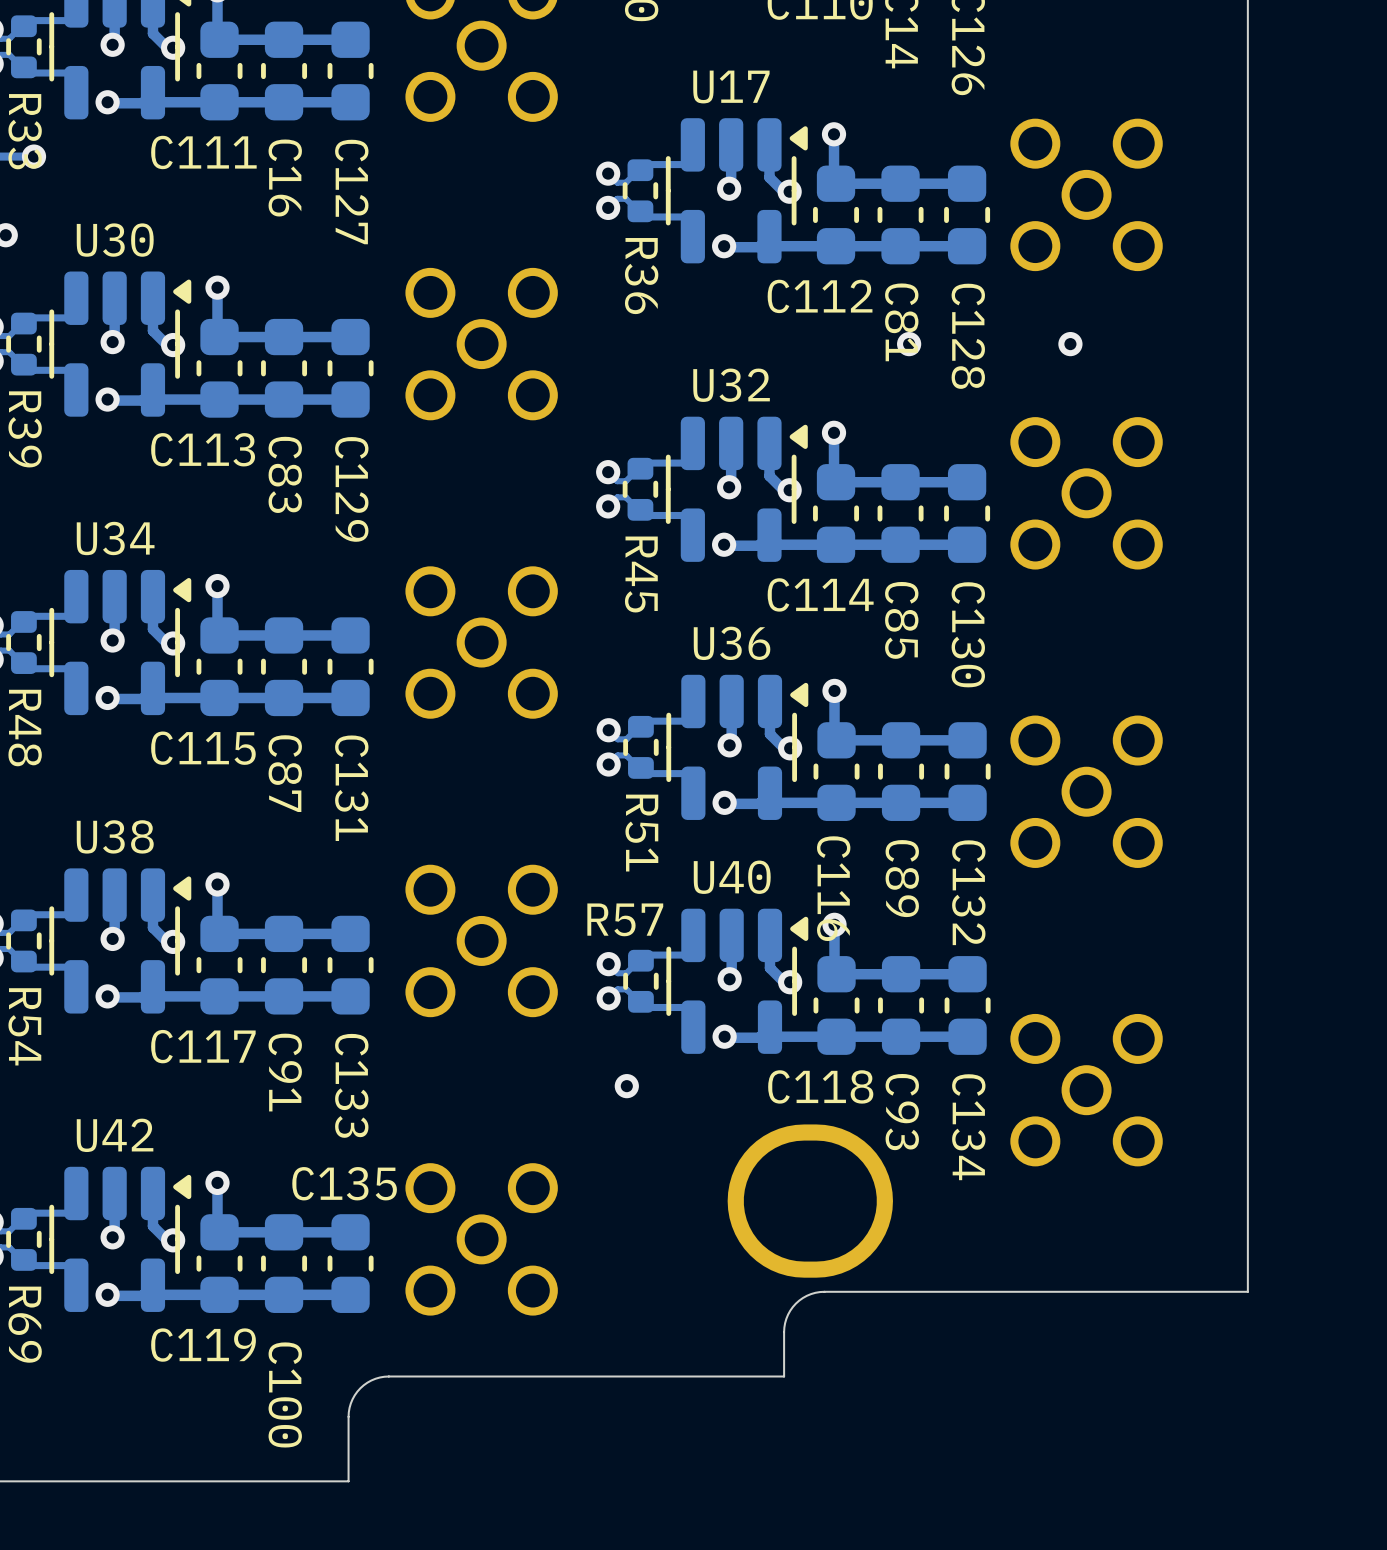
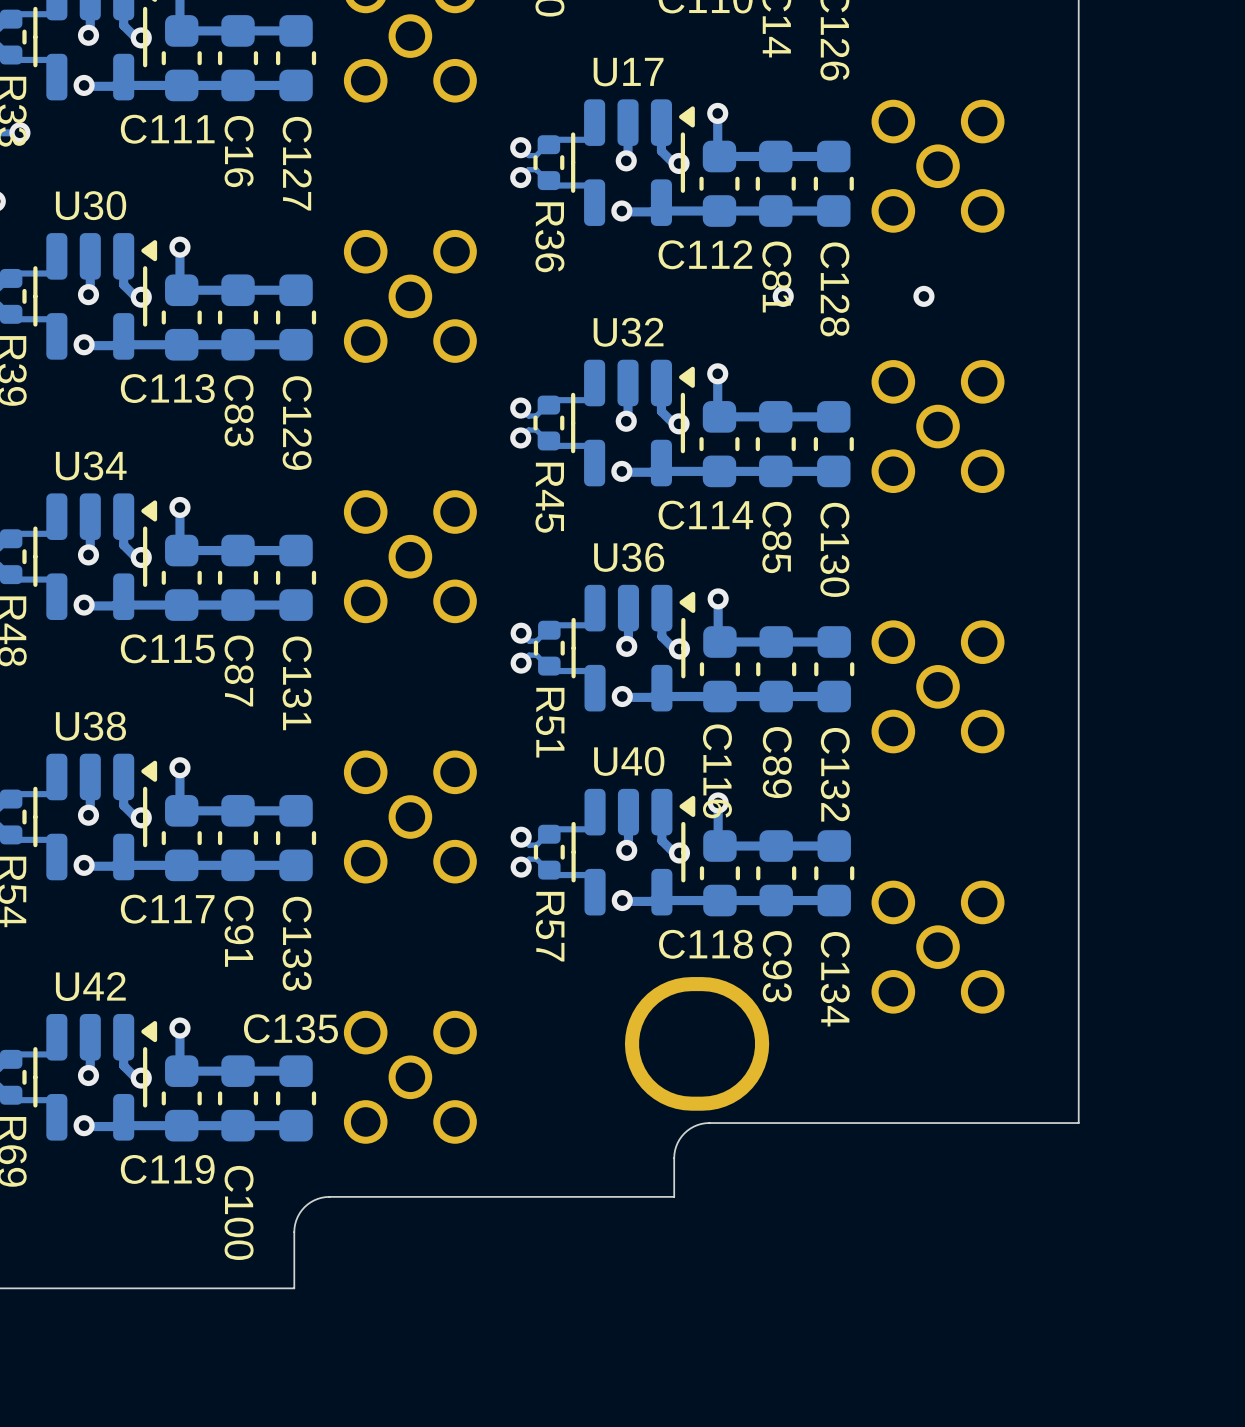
R57 name rotation: 0° (625, 919) -> 90° clockwise (550, 926)
R57 name position: R57 (625, 919) -> R57 (550, 926)
via: (626, 1086) -> none

